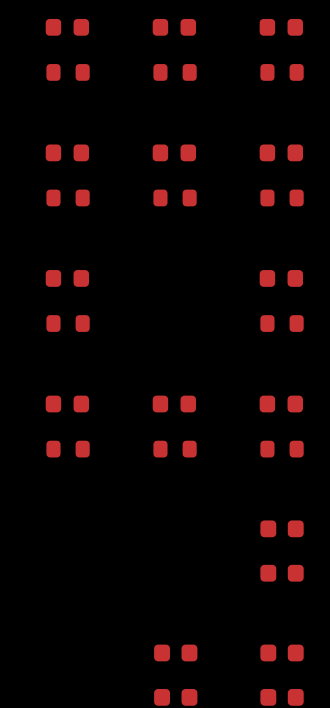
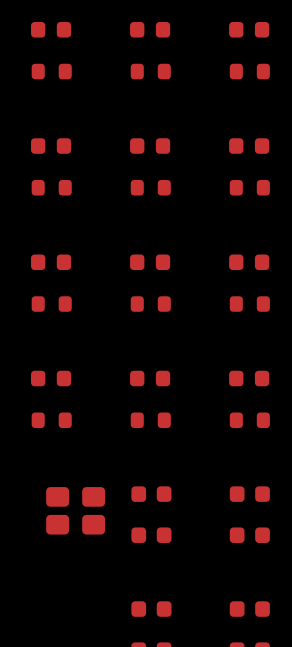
part: none -> (150, 262)
part: none -> (150, 304)
part: none -> (151, 494)
part: none -> (75, 510)
part: none -> (151, 535)

